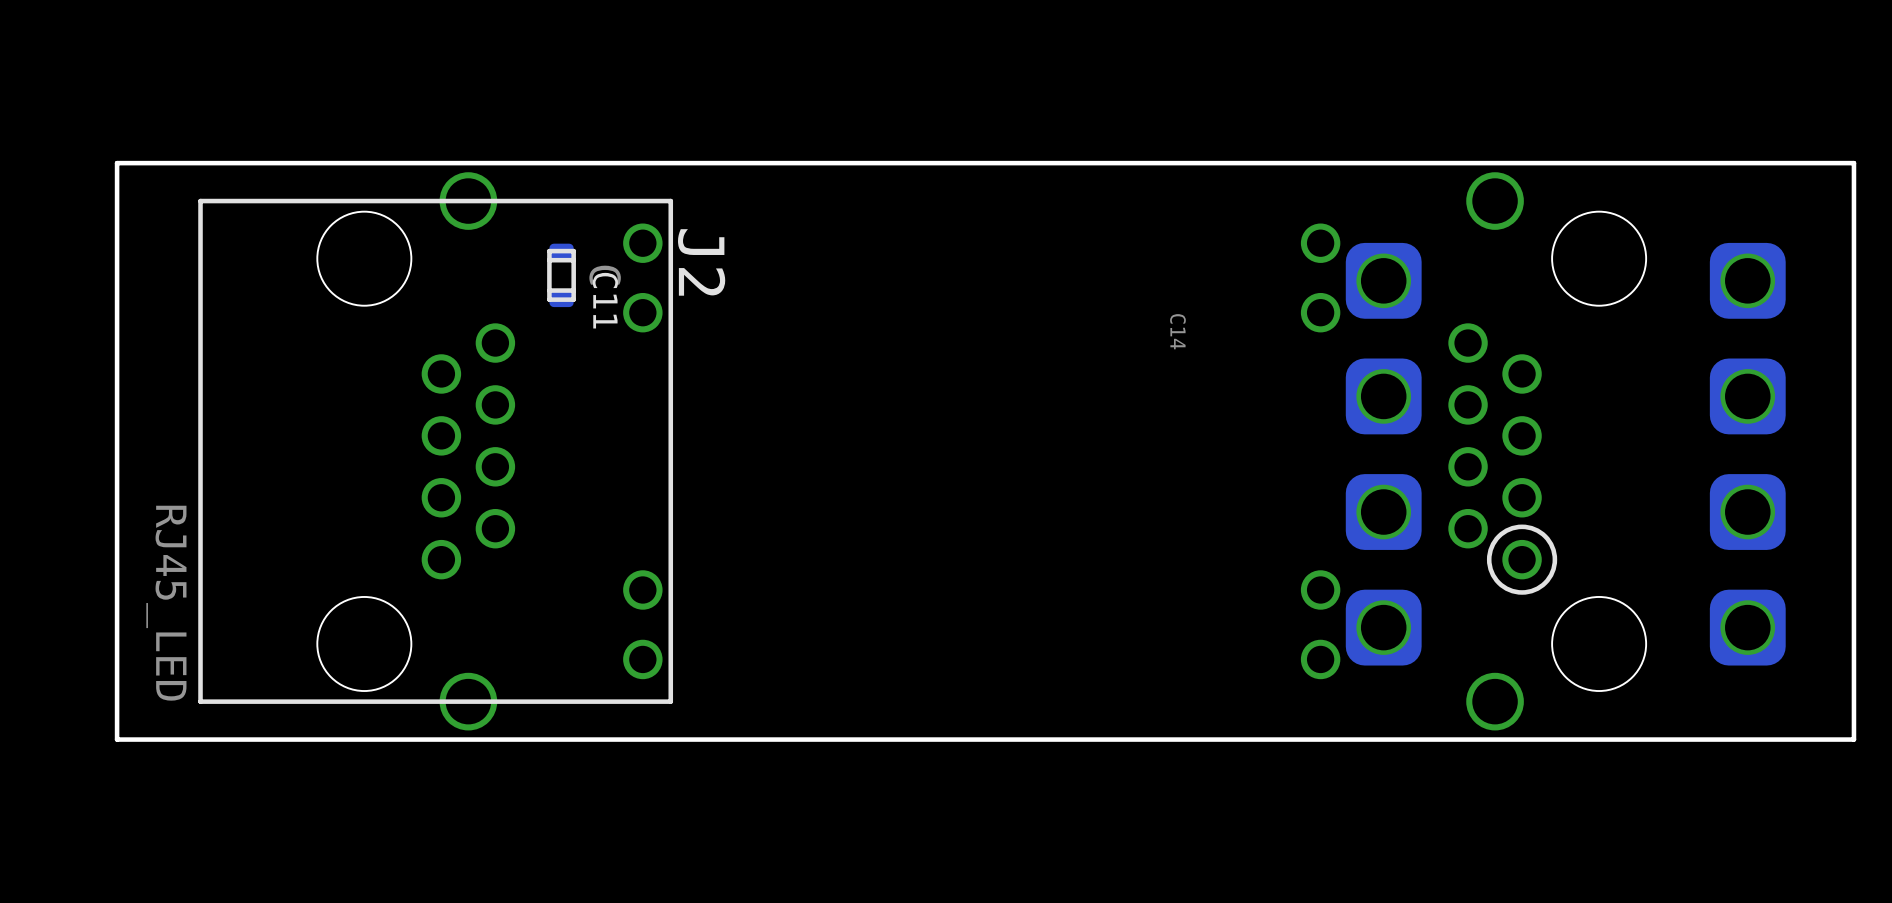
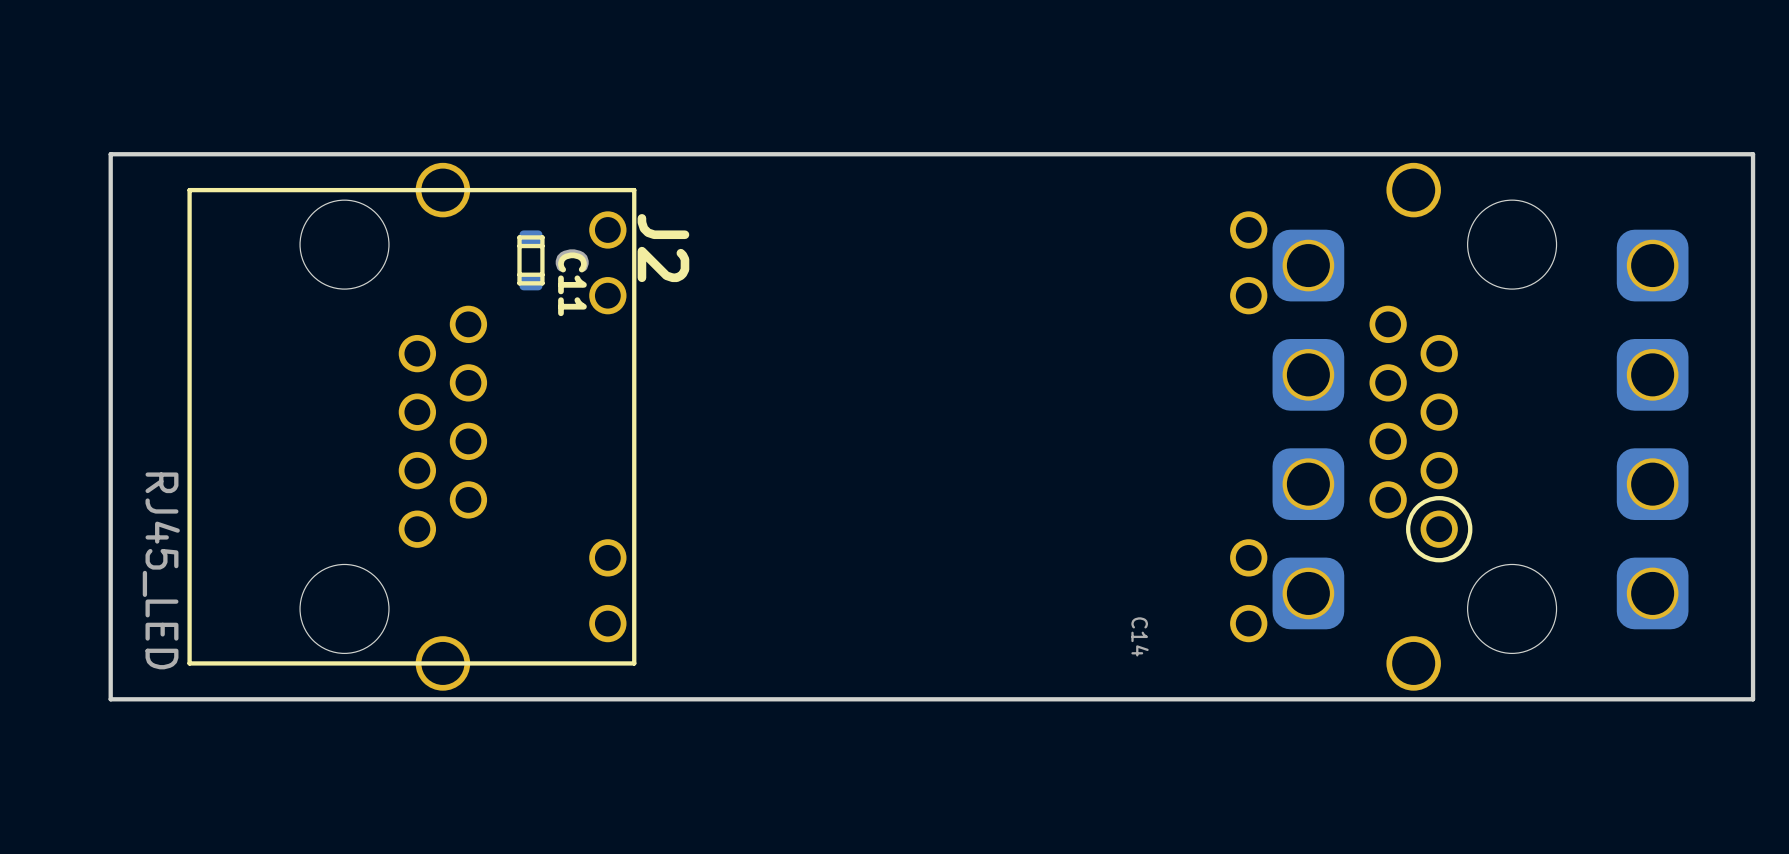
C14 position: (1177, 331) -> (1140, 636)

